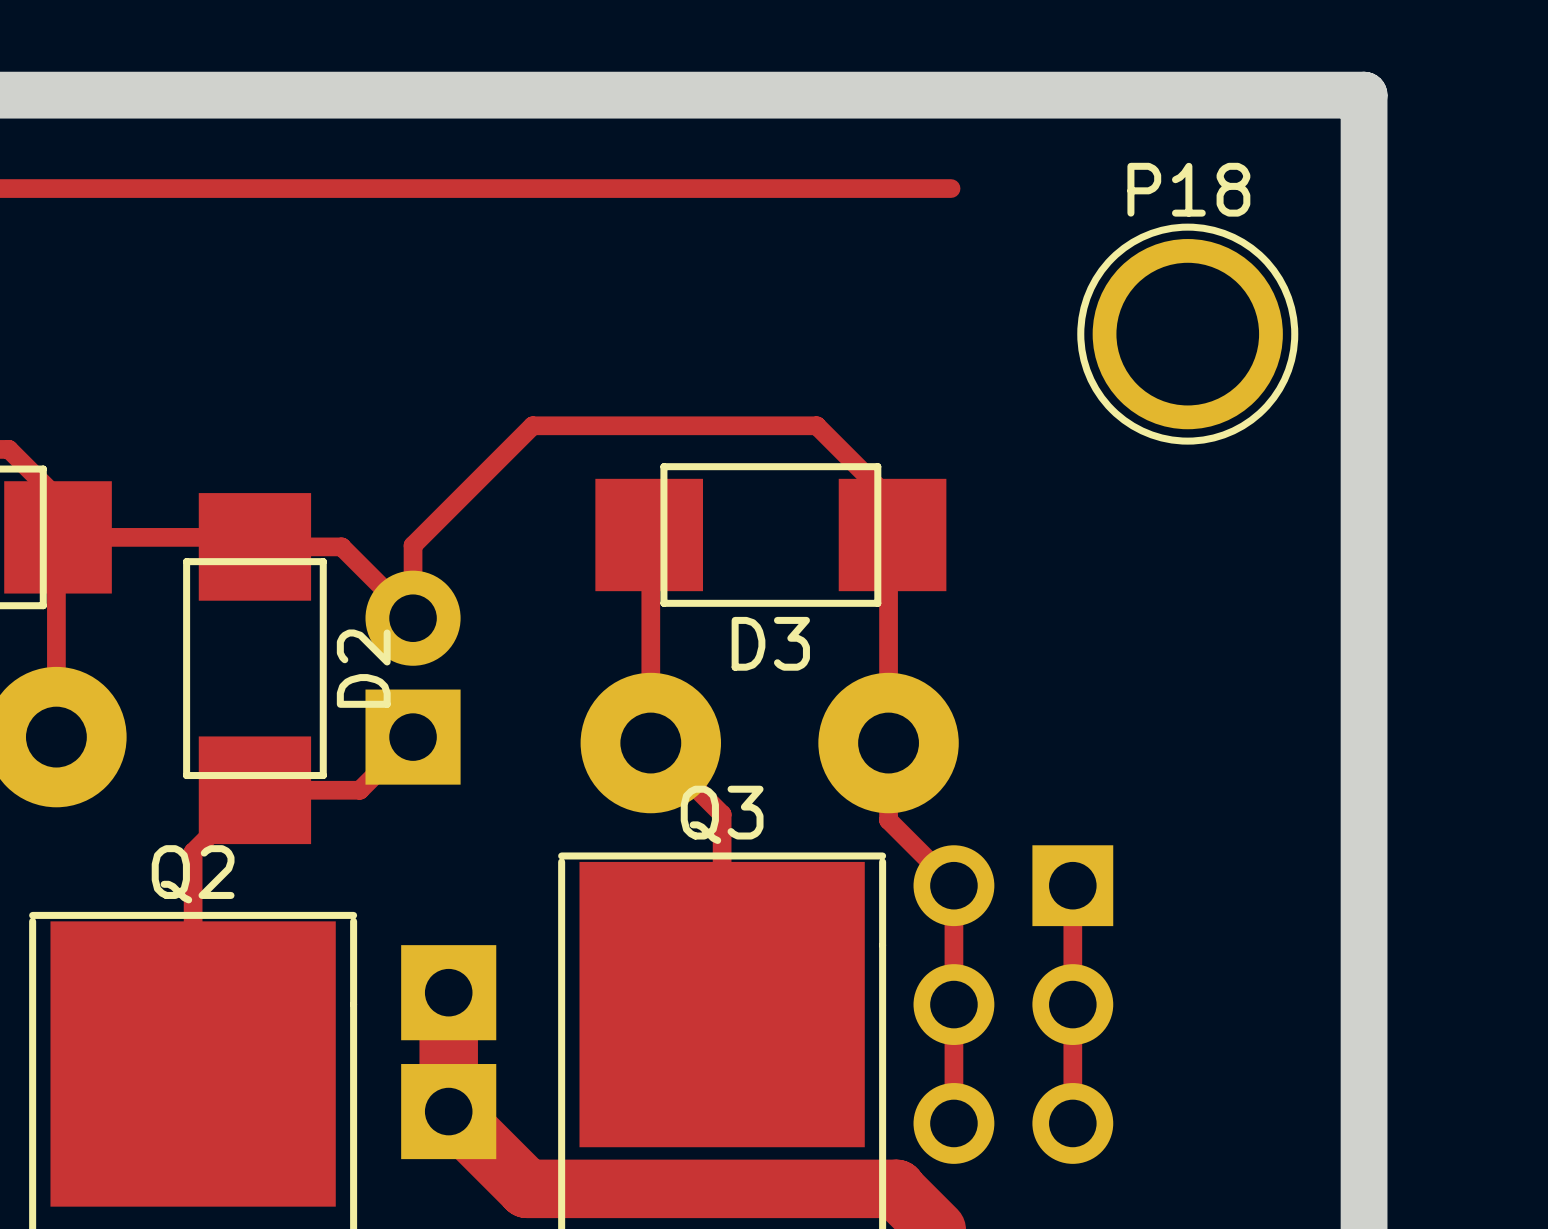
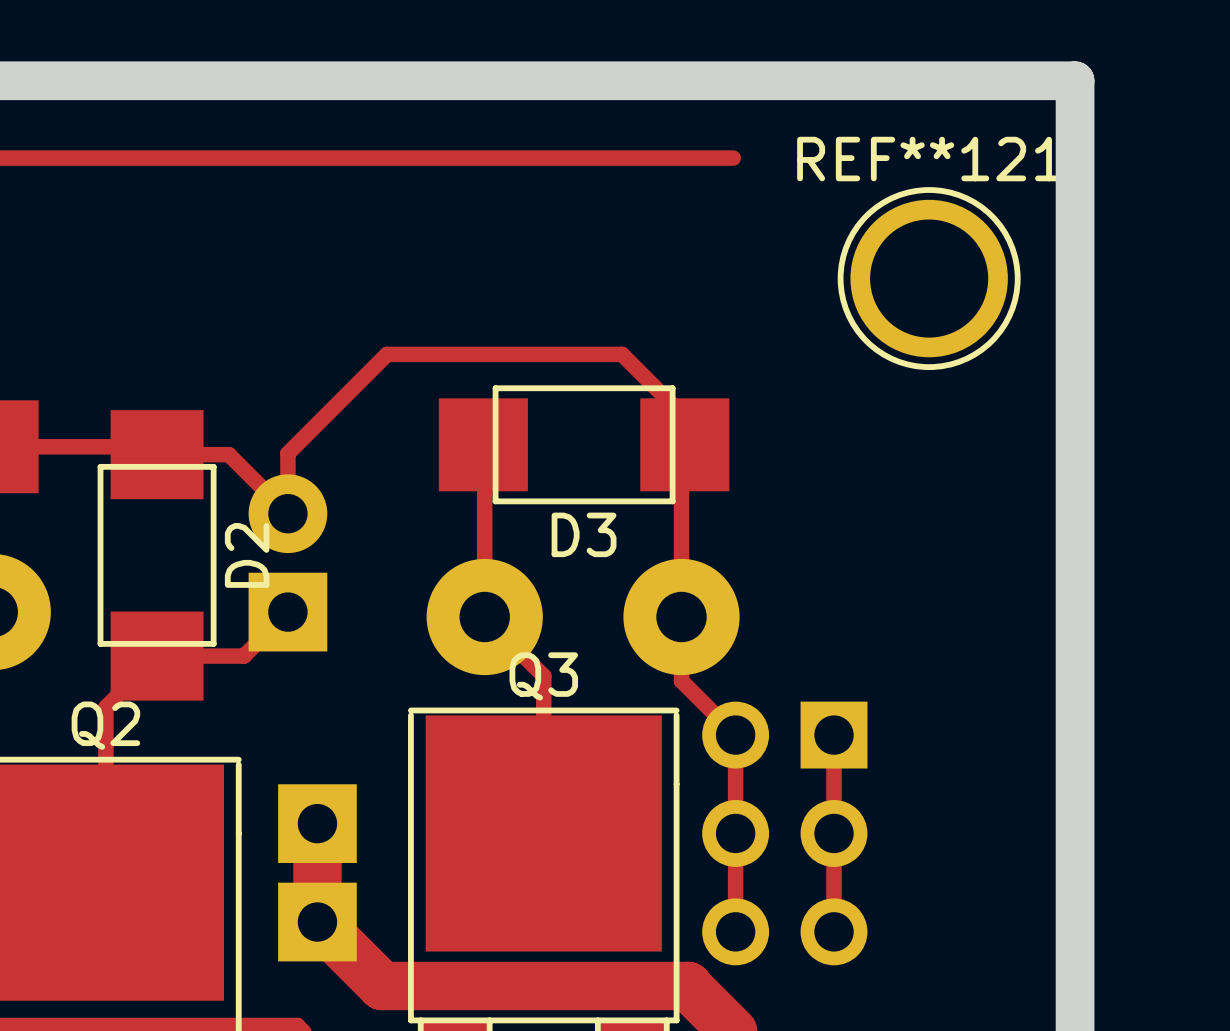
P18 name: P18 (1188, 189) -> REF**121 (930, 159)

